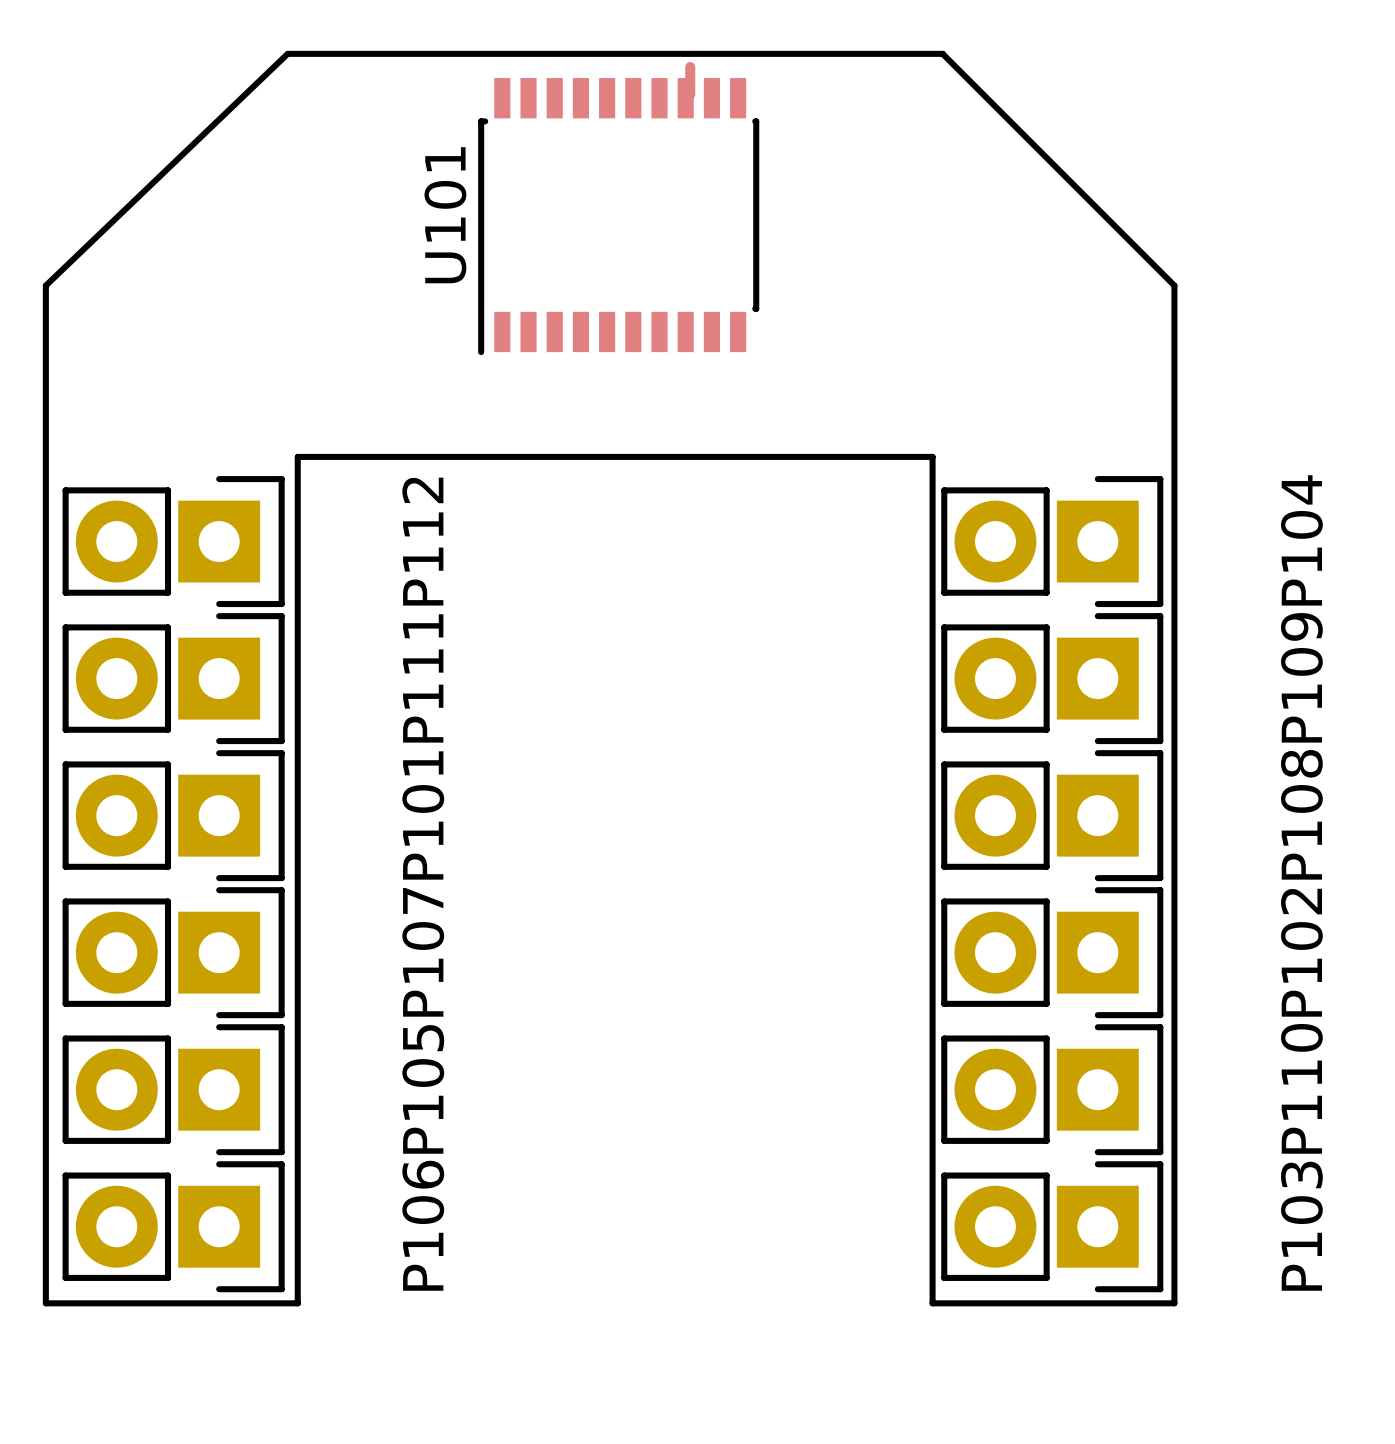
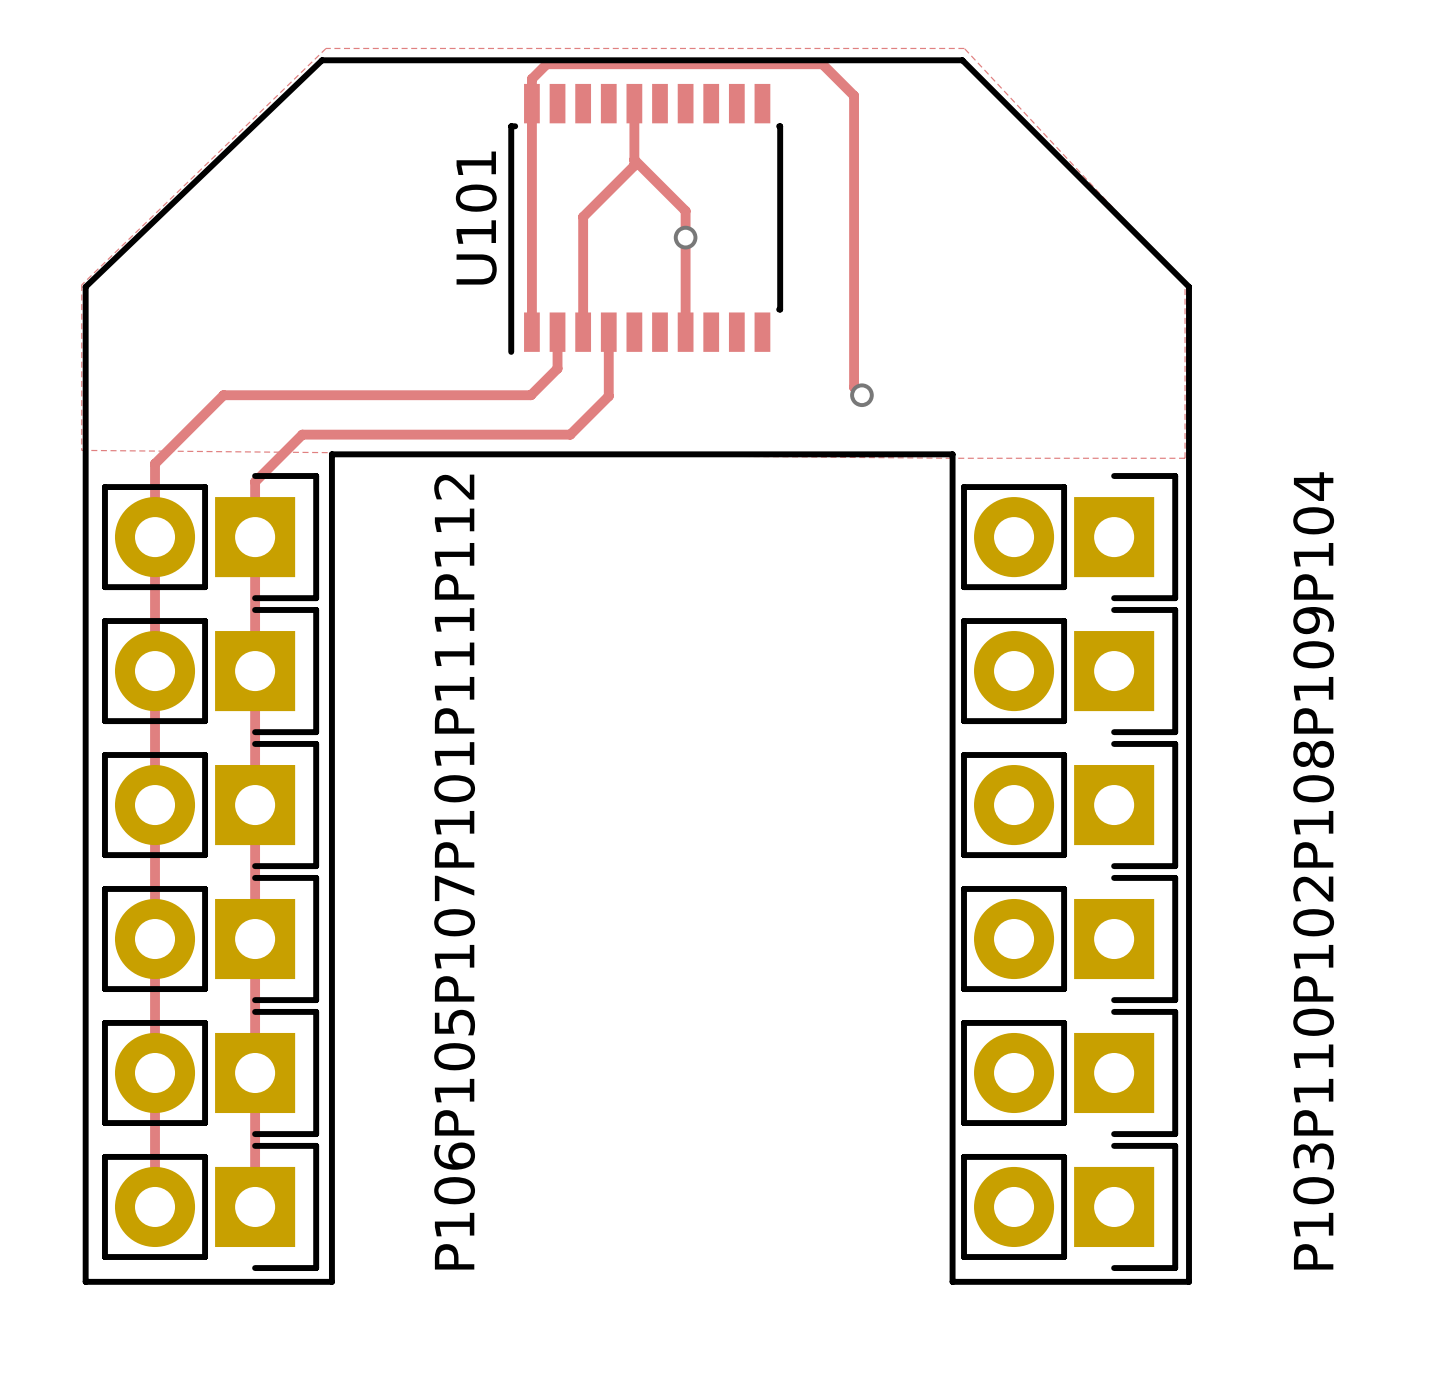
zone outline: none -> (326, 48) (964, 48) (1185, 284) (1185, 458) (948, 458) (81, 450) (81, 284) (326, 48)
track: (690, 67) (690, 94) -> none
track: none -> (634, 103) (634, 165) (583, 216) (583, 332)
track: none -> (634, 159) (685, 211) (685, 332)
via: none -> (685, 237)
track: none -> (531, 332) (531, 79) (546, 64) (822, 64) (854, 95) (854, 387) (861, 395)
track: none -> (557, 332) (557, 368) (530, 395) (223, 395) (155, 463) (155, 1206)
track: none -> (608, 332) (608, 396) (570, 434) (302, 434) (255, 481) (255, 1206)
via: none -> (861, 395)

